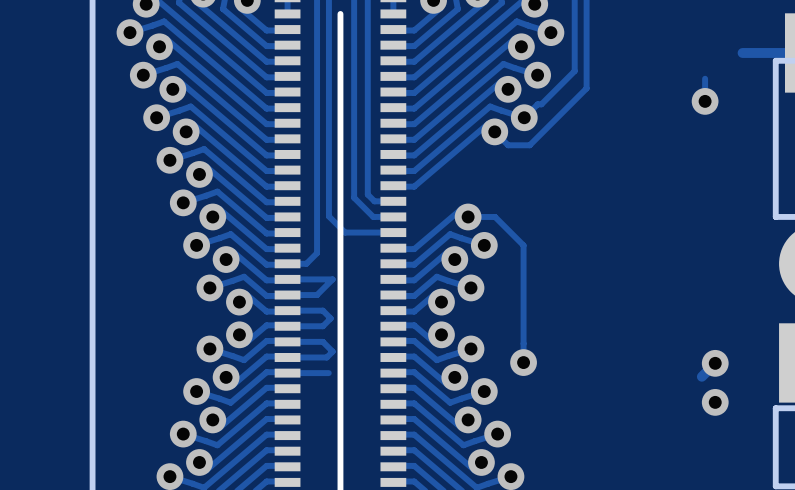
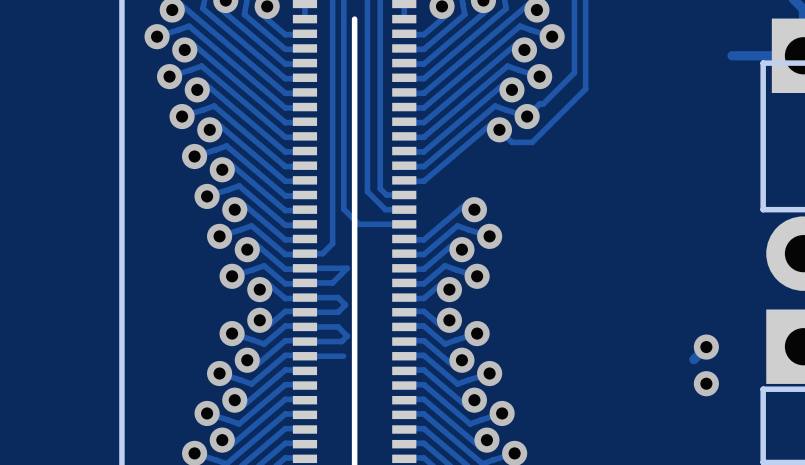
track: (705, 78) (705, 101) -> none
via: (705, 101) -> none
track: (468, 216) (495, 216) (523, 245) (523, 362) -> none
via: (523, 362) -> none

